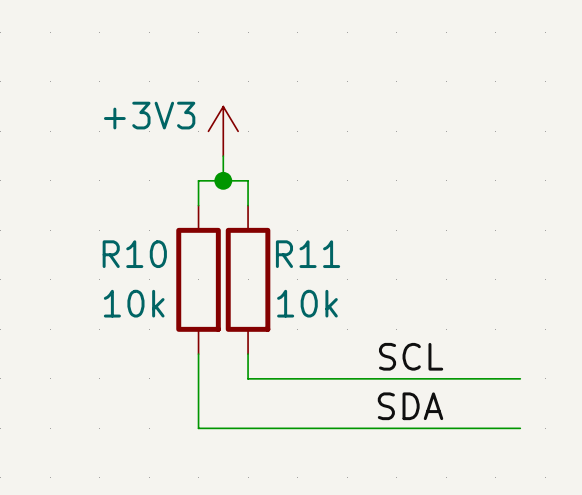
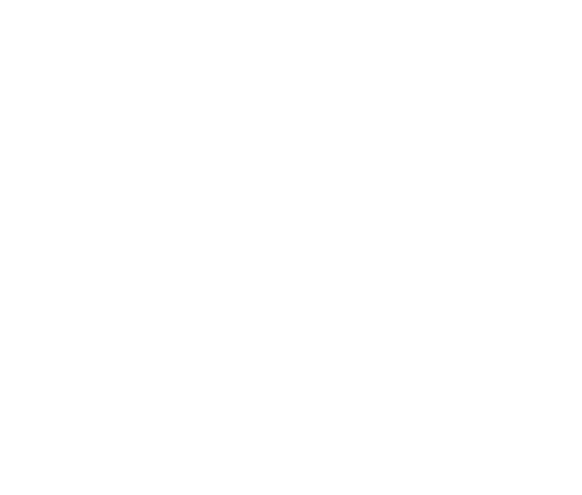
power symbol: +3V3 (223, 131) -> none
wire: (223, 156) (223, 180) -> none
junction: (223, 180) -> none
wire: (198, 205) (198, 180) (248, 180) (248, 205) -> none
R10: 10k (198, 279) -> none
R11: 10k (248, 279) -> none
wire: (198, 354) (198, 428) (520, 428) -> none
wire: (248, 354) (248, 378) (520, 378) -> none
label: SCL (411, 356) -> none
label: SDA (410, 406) -> none

